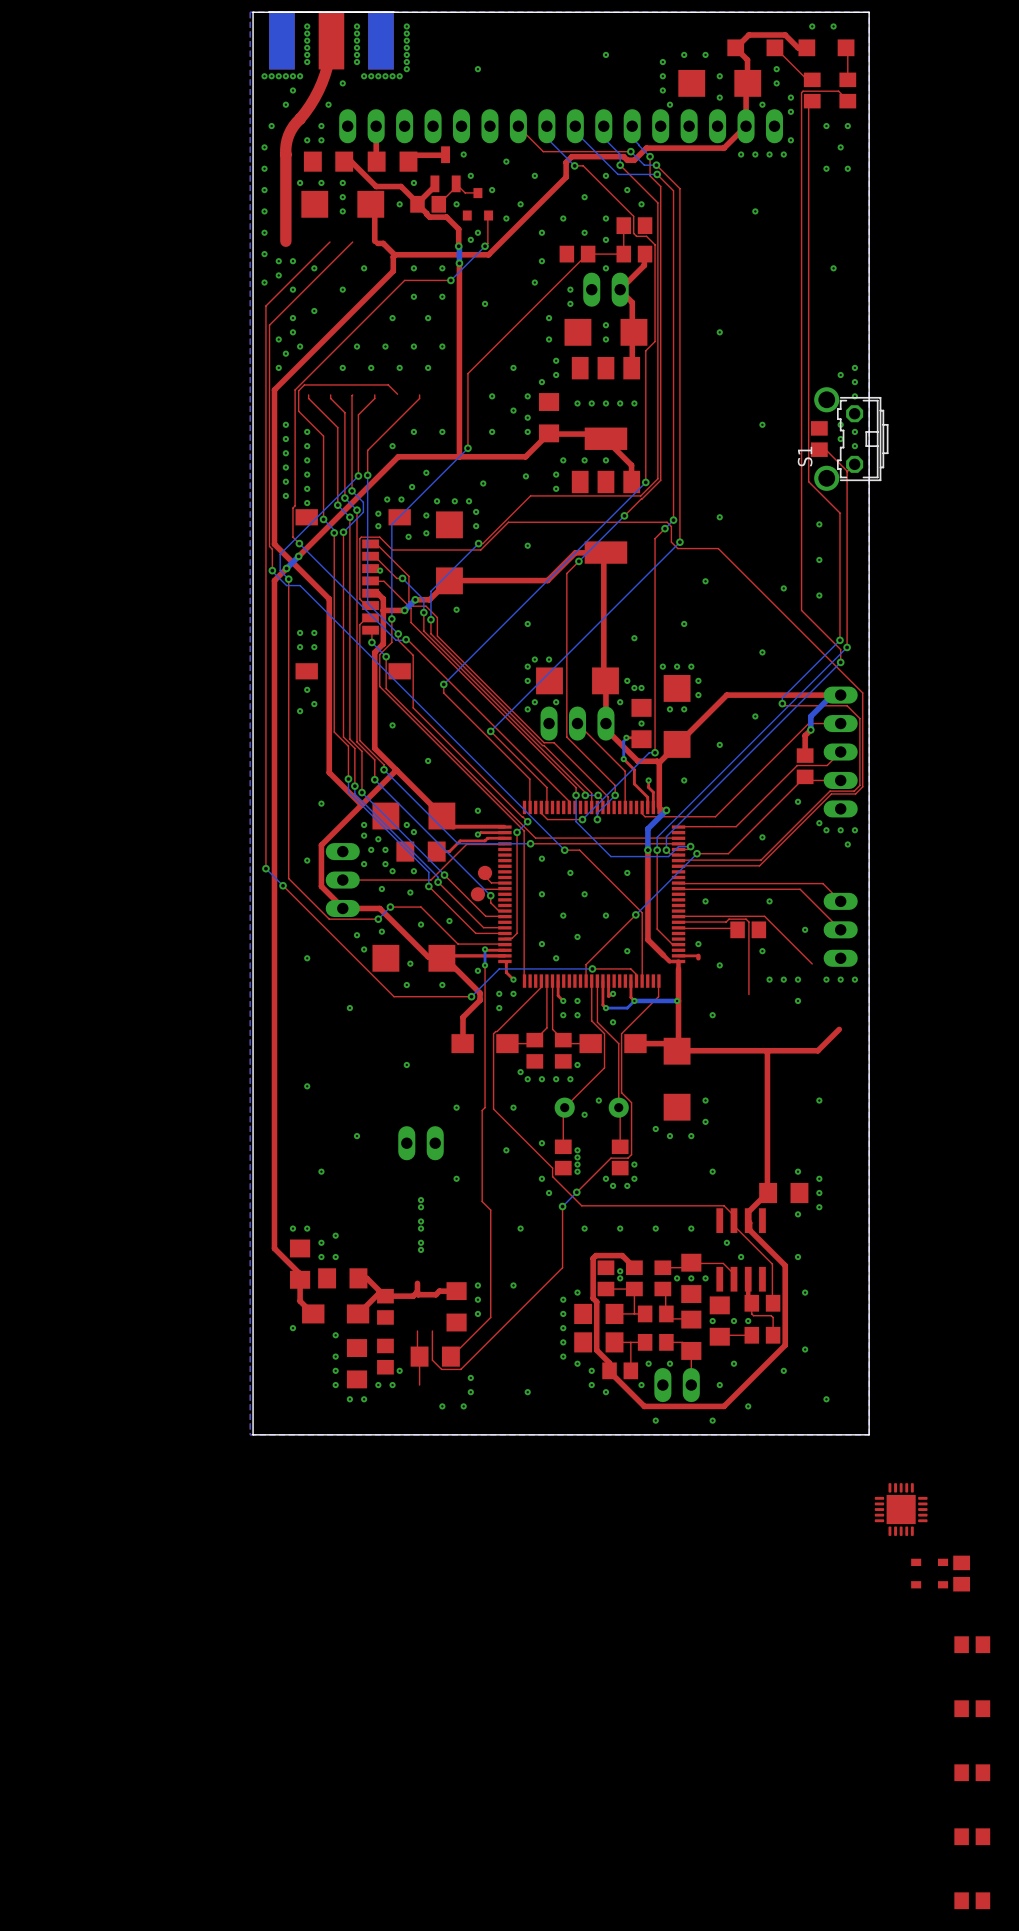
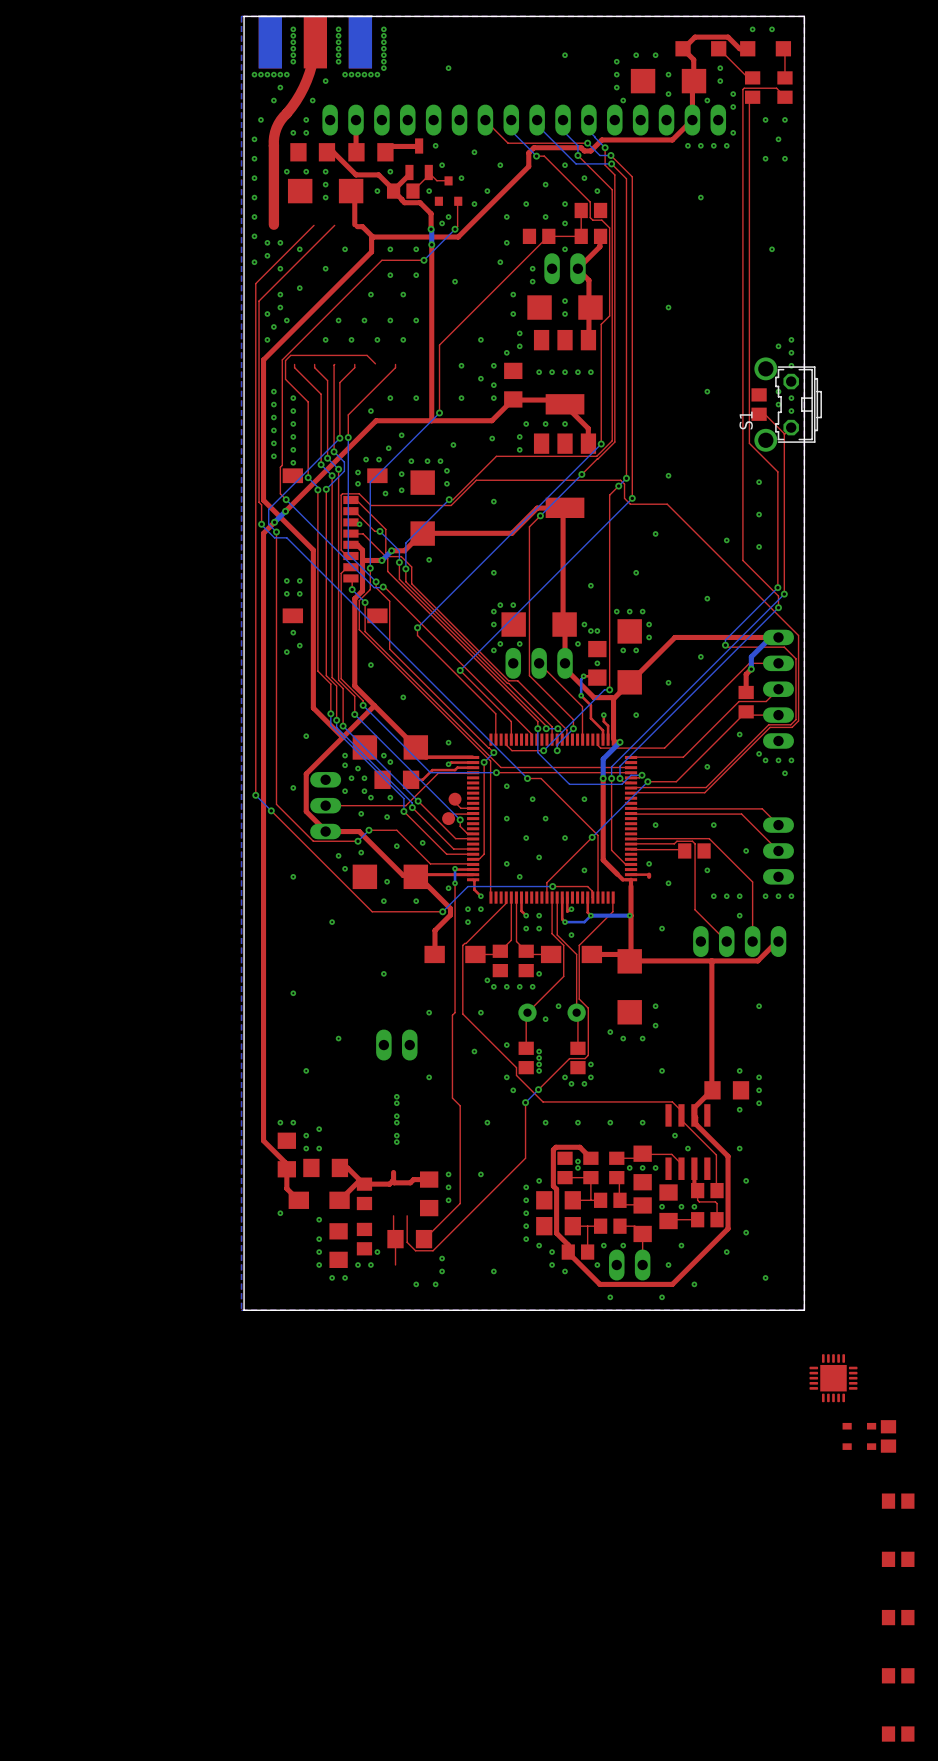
top track: none -> (752, 882) (752, 941)
top track: none -> (695, 909) (726, 941)
part: none -> (739, 941)

